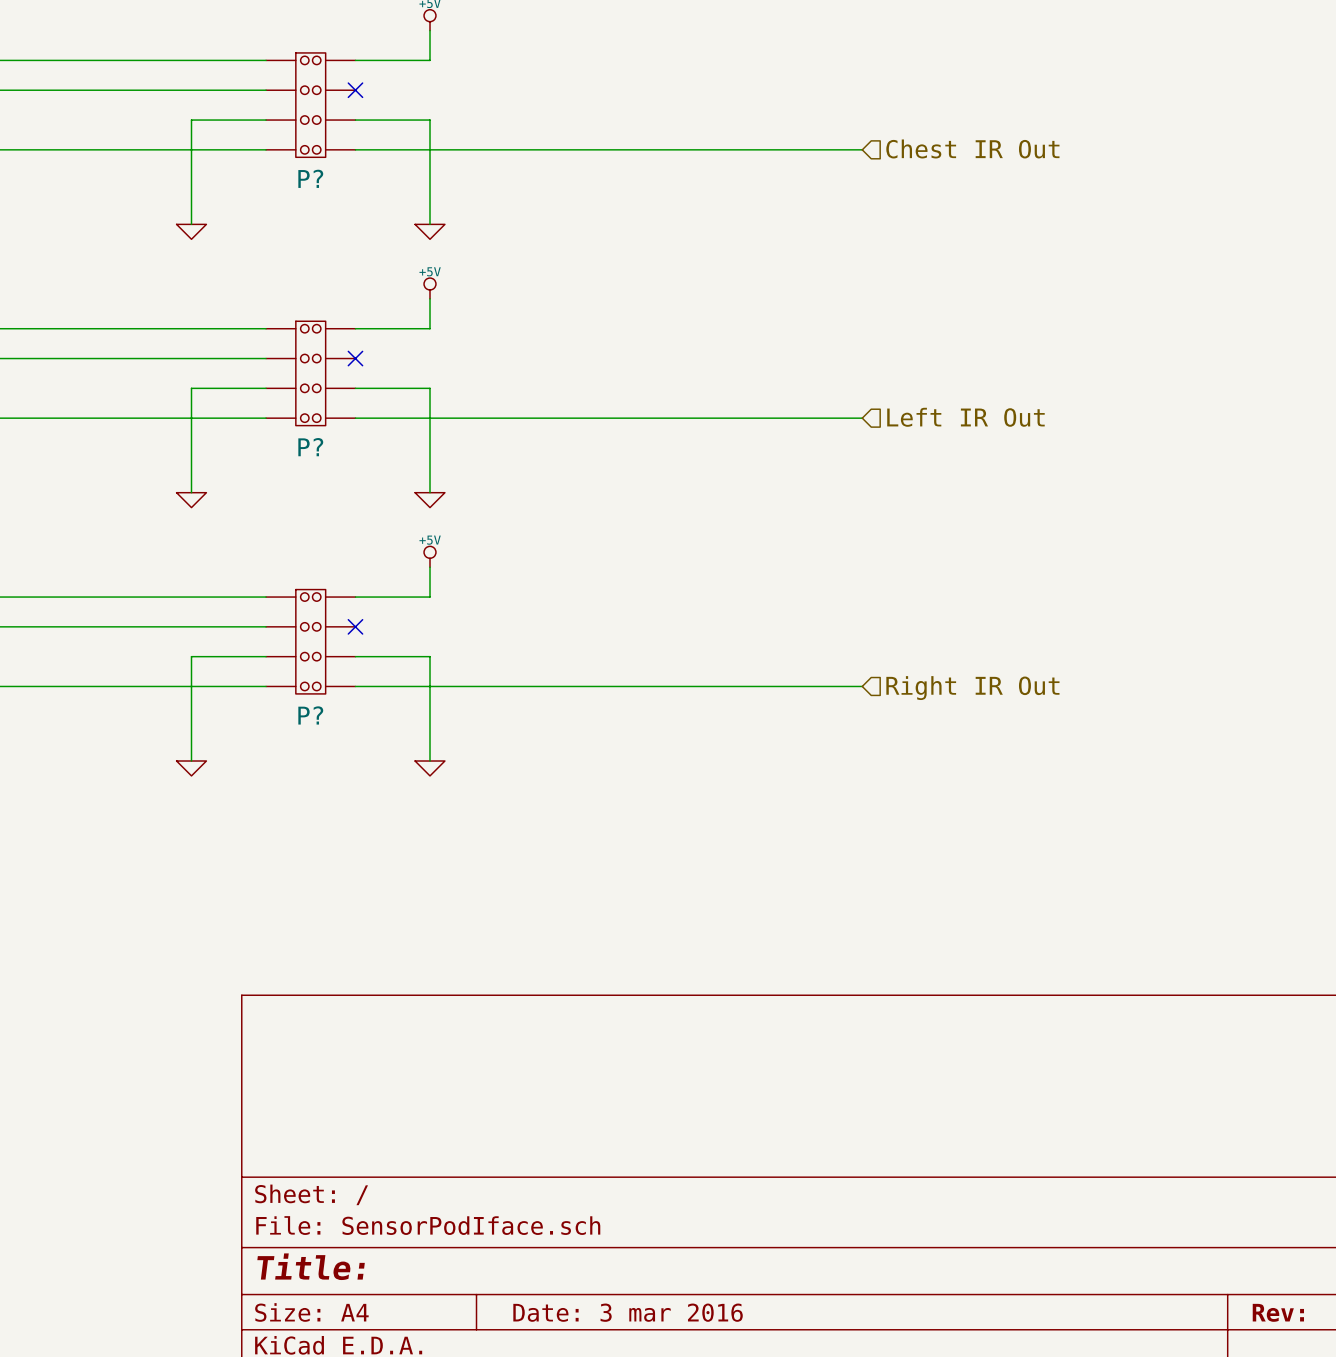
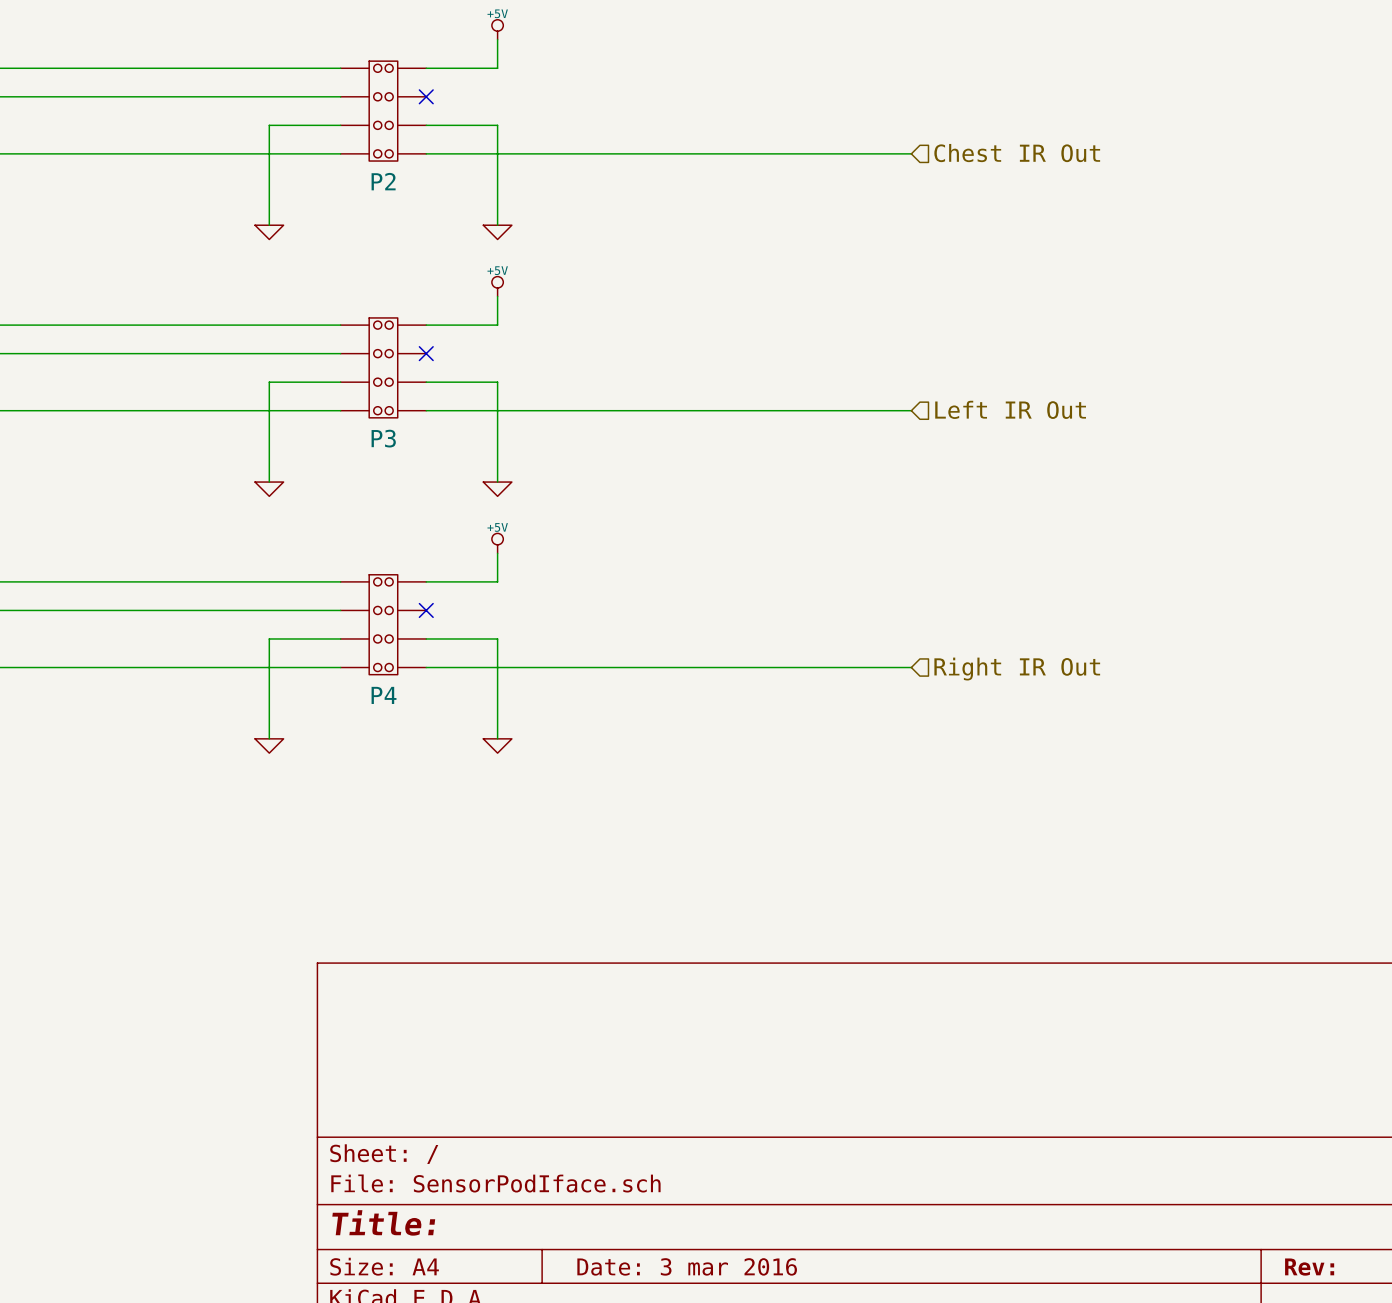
P? name: P? (310, 178) -> P2 (383, 181)
P? name: P? (310, 447) -> P3 (383, 438)
P? name: P? (310, 715) -> P4 (384, 695)

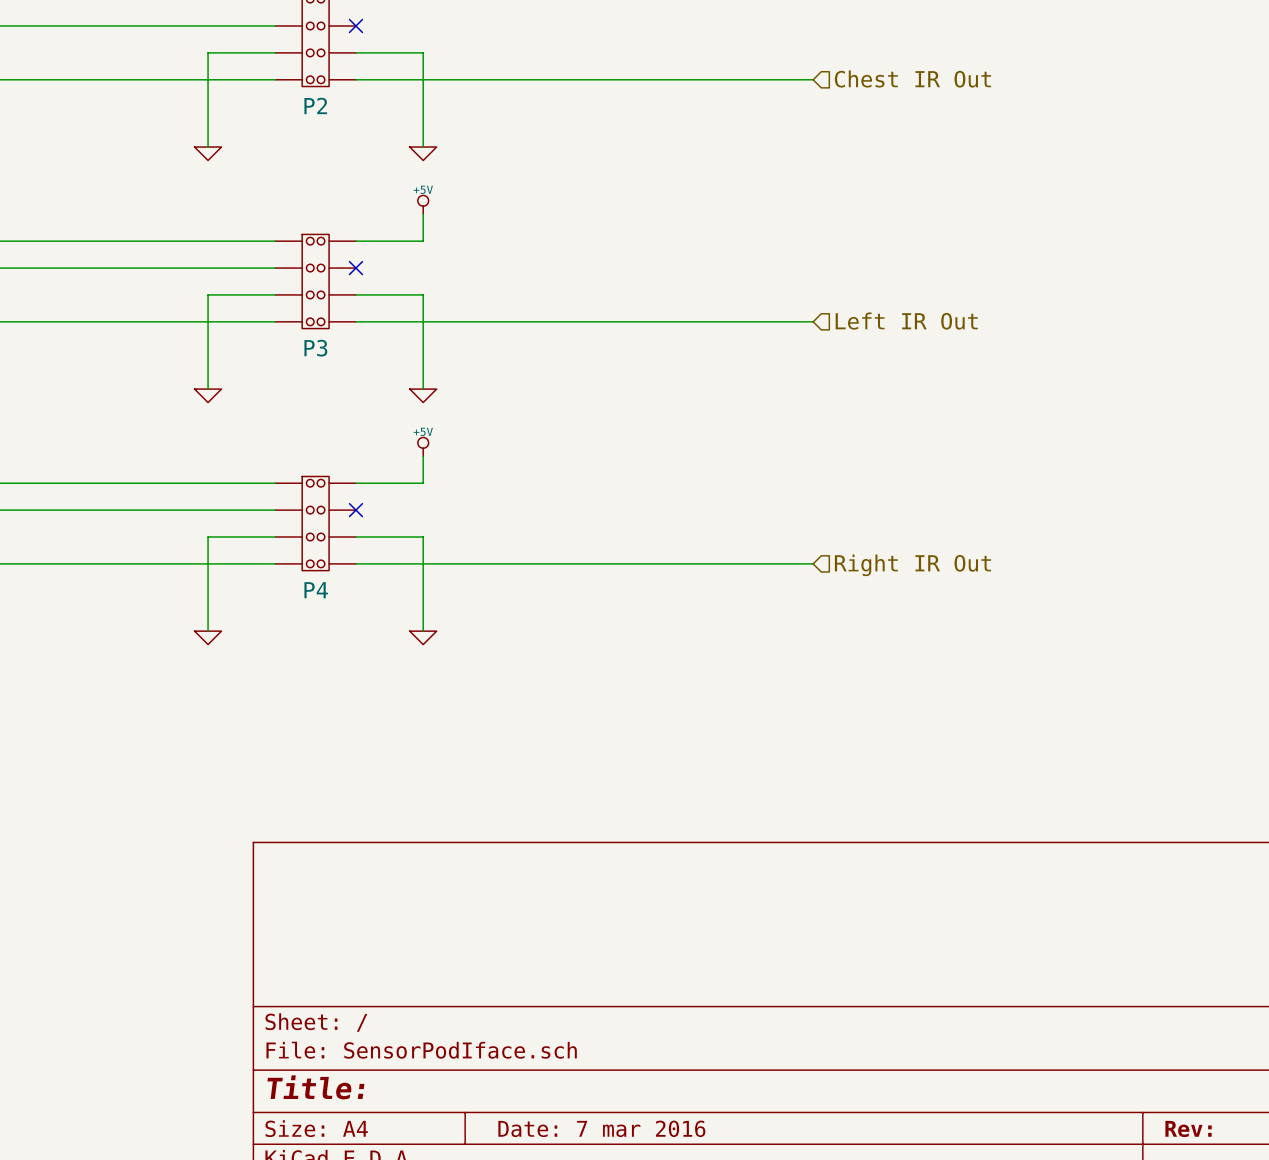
title block: Date: 3 mar 2016 (687, 1266) -> Date: 7 mar 2016 (601, 1128)

